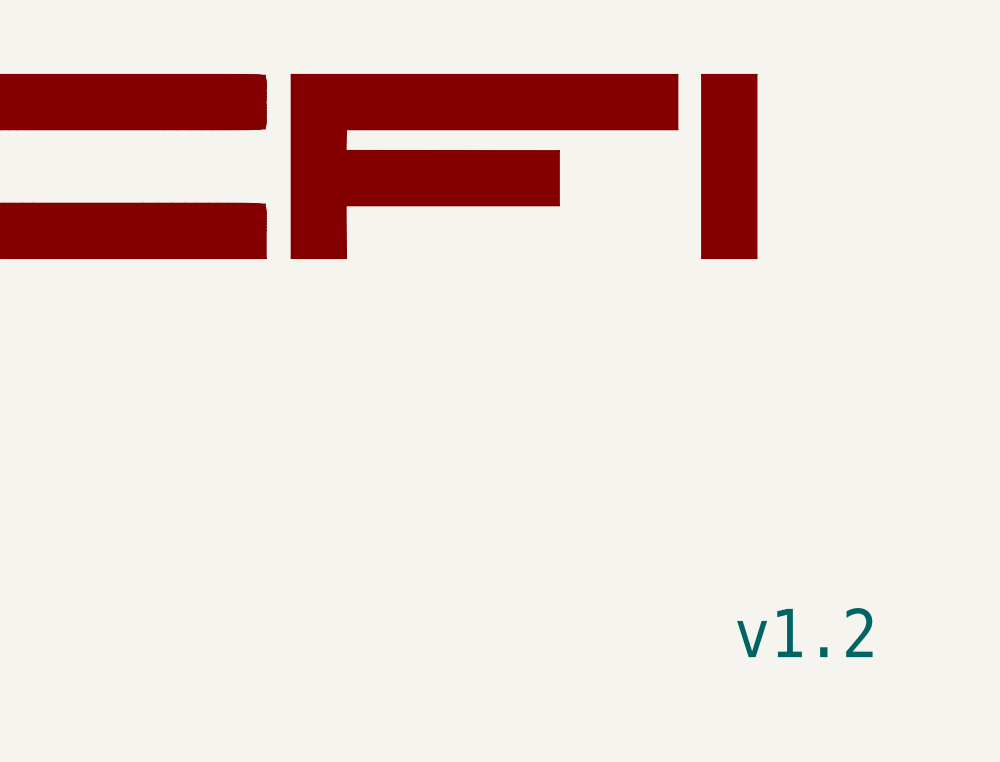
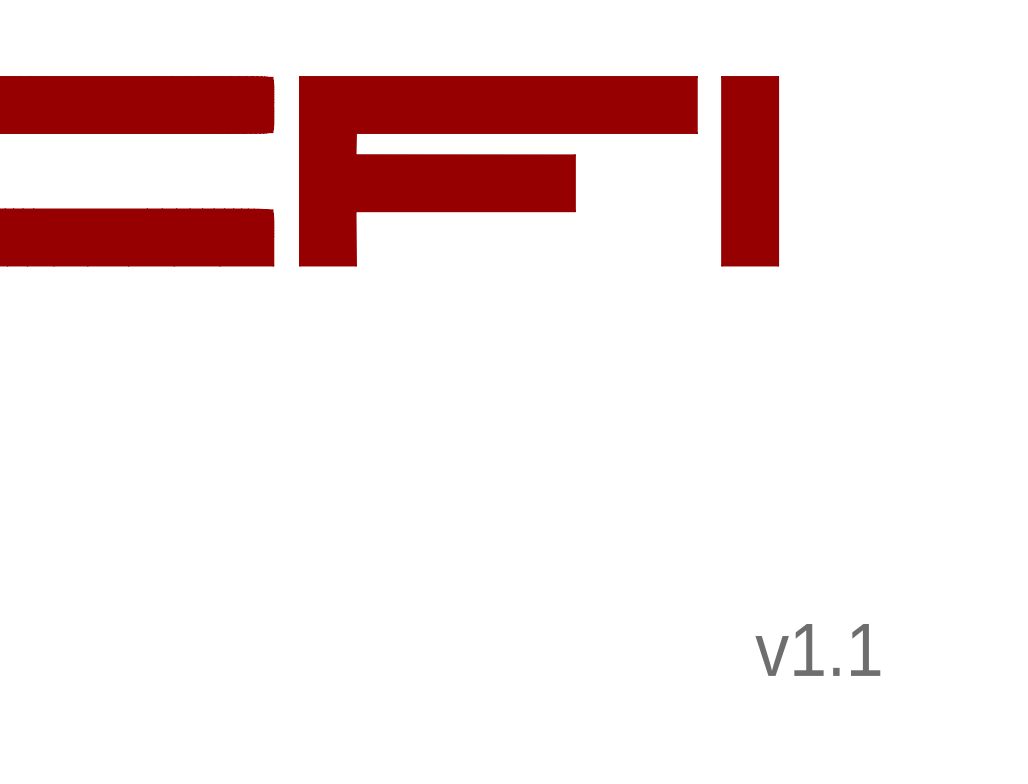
text: v1.2 (804, 632) -> v1.1 (817, 649)

